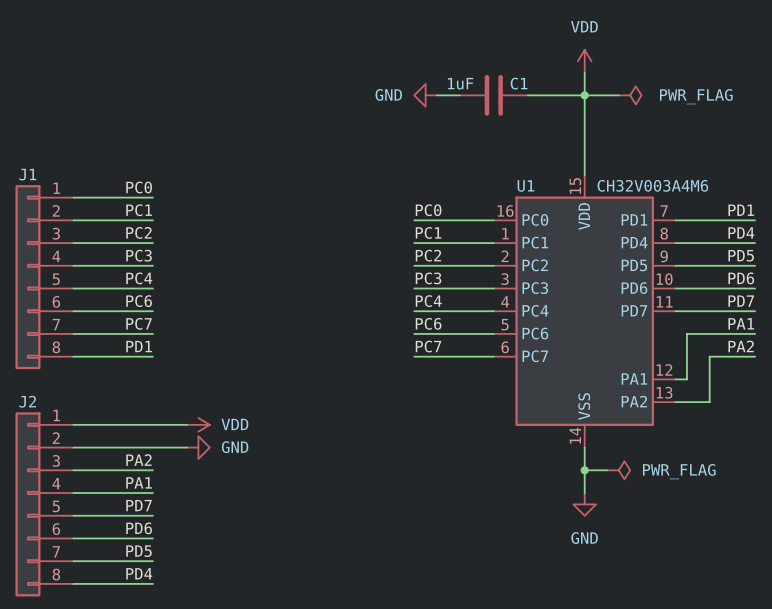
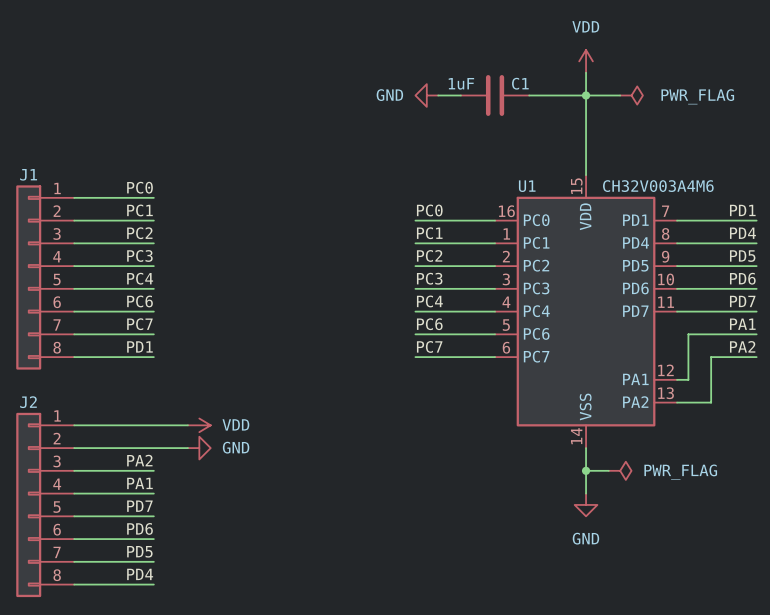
C1 text: 1uF (460, 83) -> none
C1 value: none -> 1uF (461, 83)
U1 value position: CH32V003A4M6 (652, 185) -> CH32V003A4M6 (658, 186)

